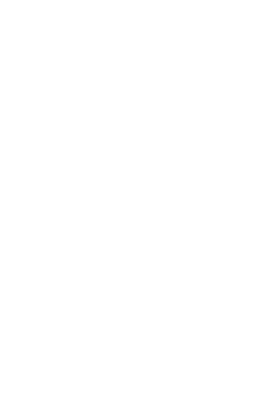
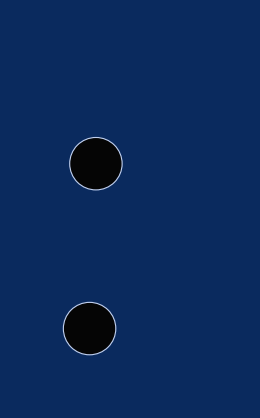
part: none -> (95, 163)
part: none -> (89, 328)

